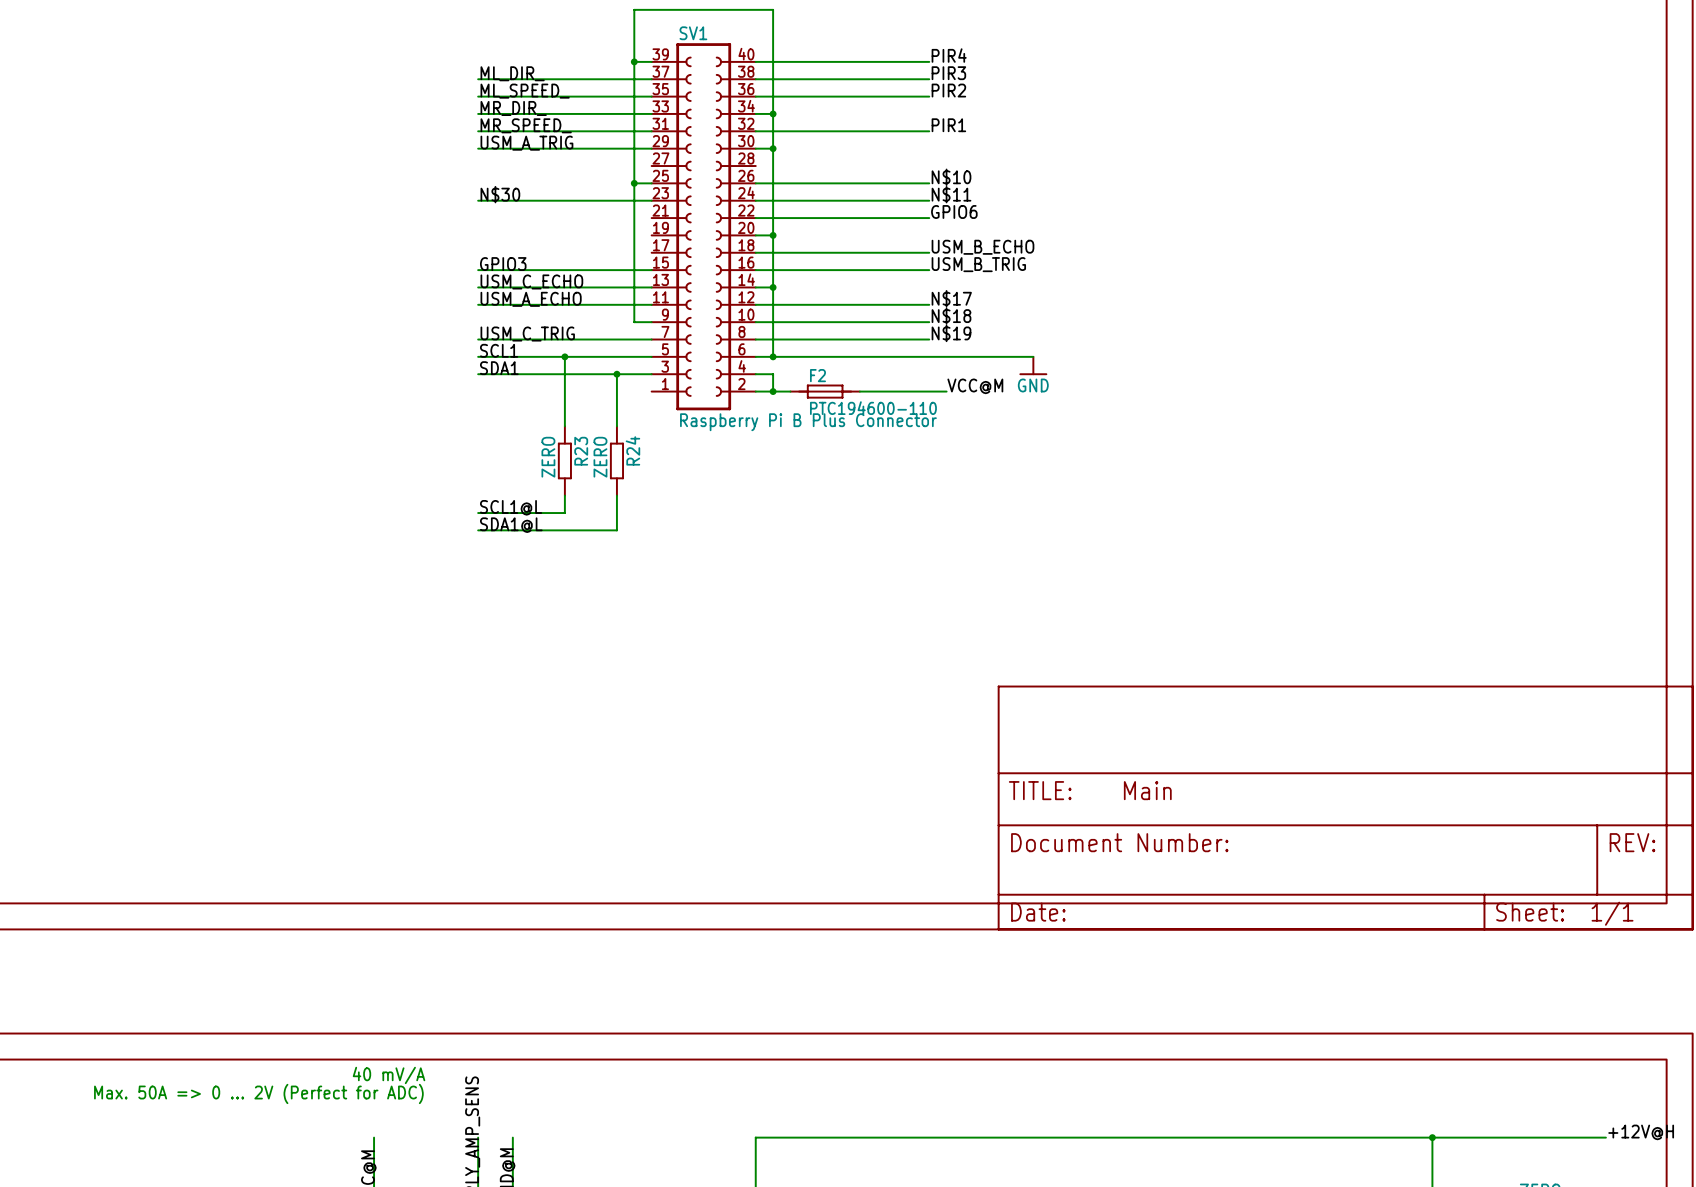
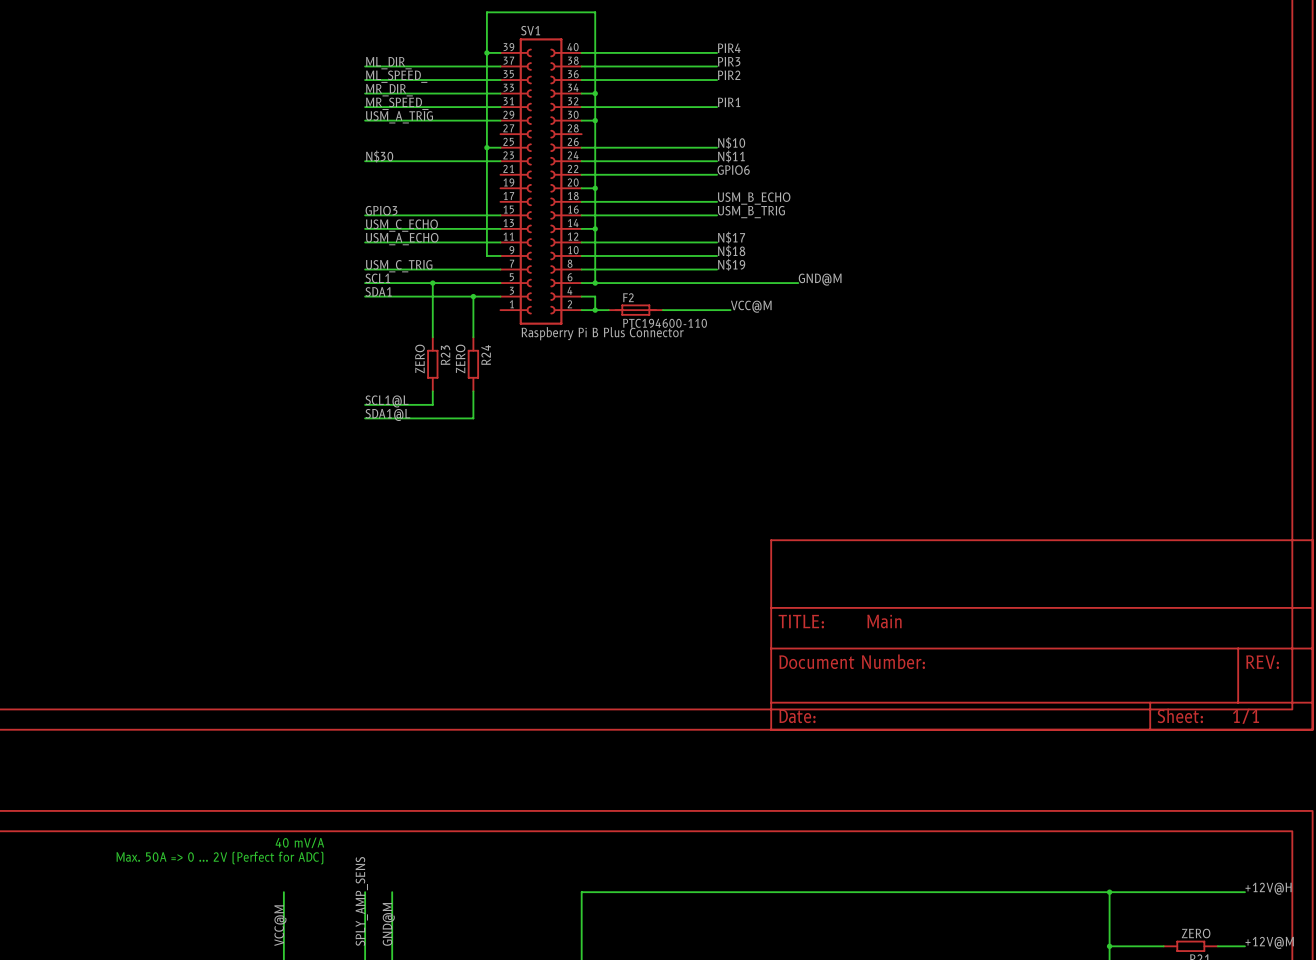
label: none -> GND@M (820, 279)
power symbol: GND (1033, 365) -> none

